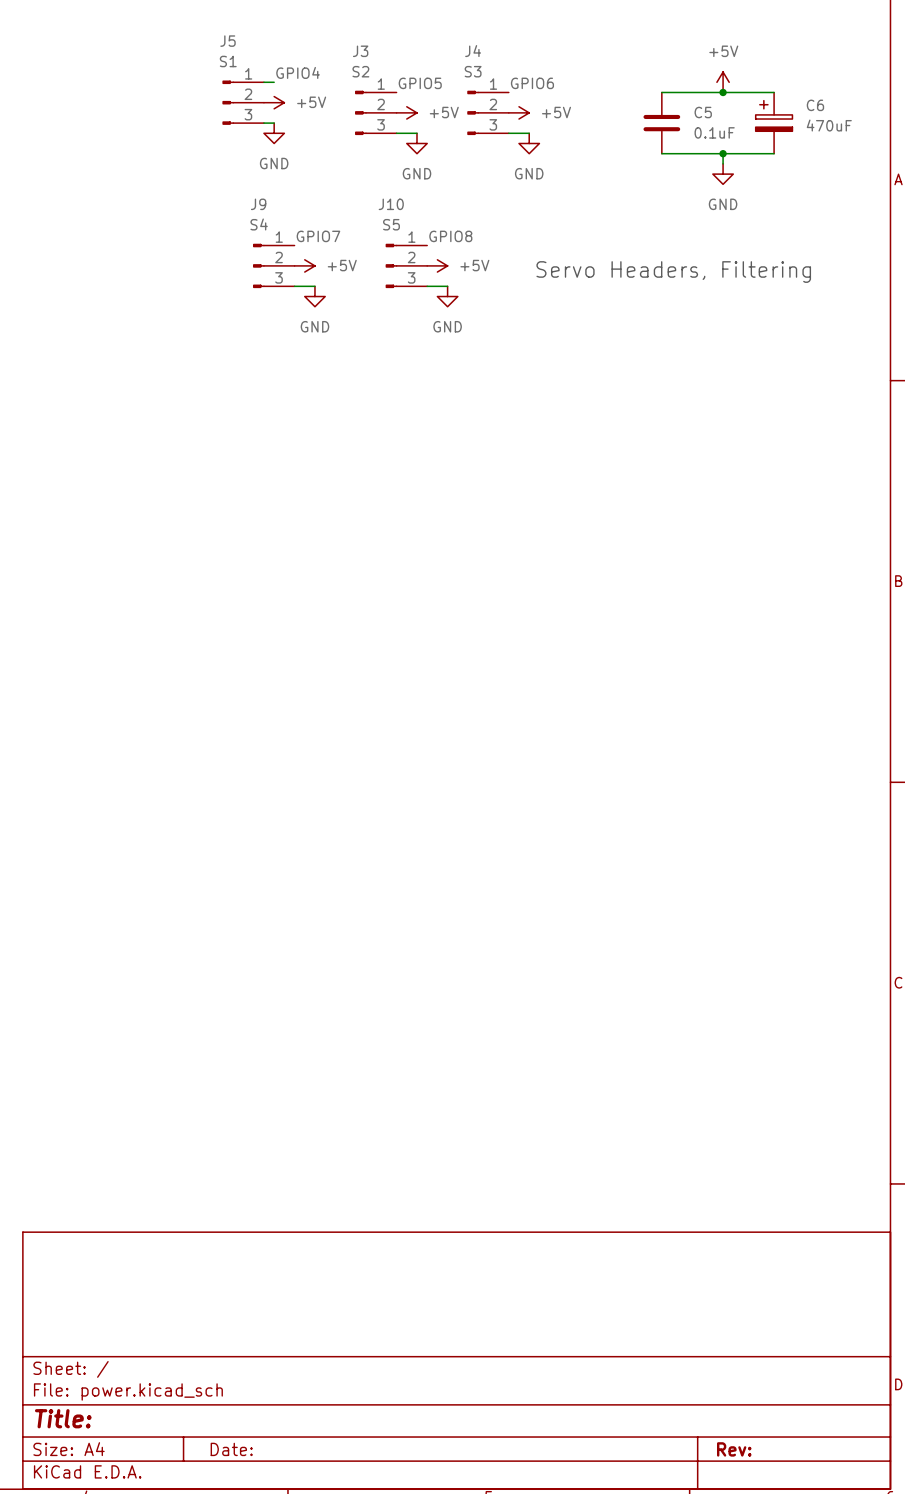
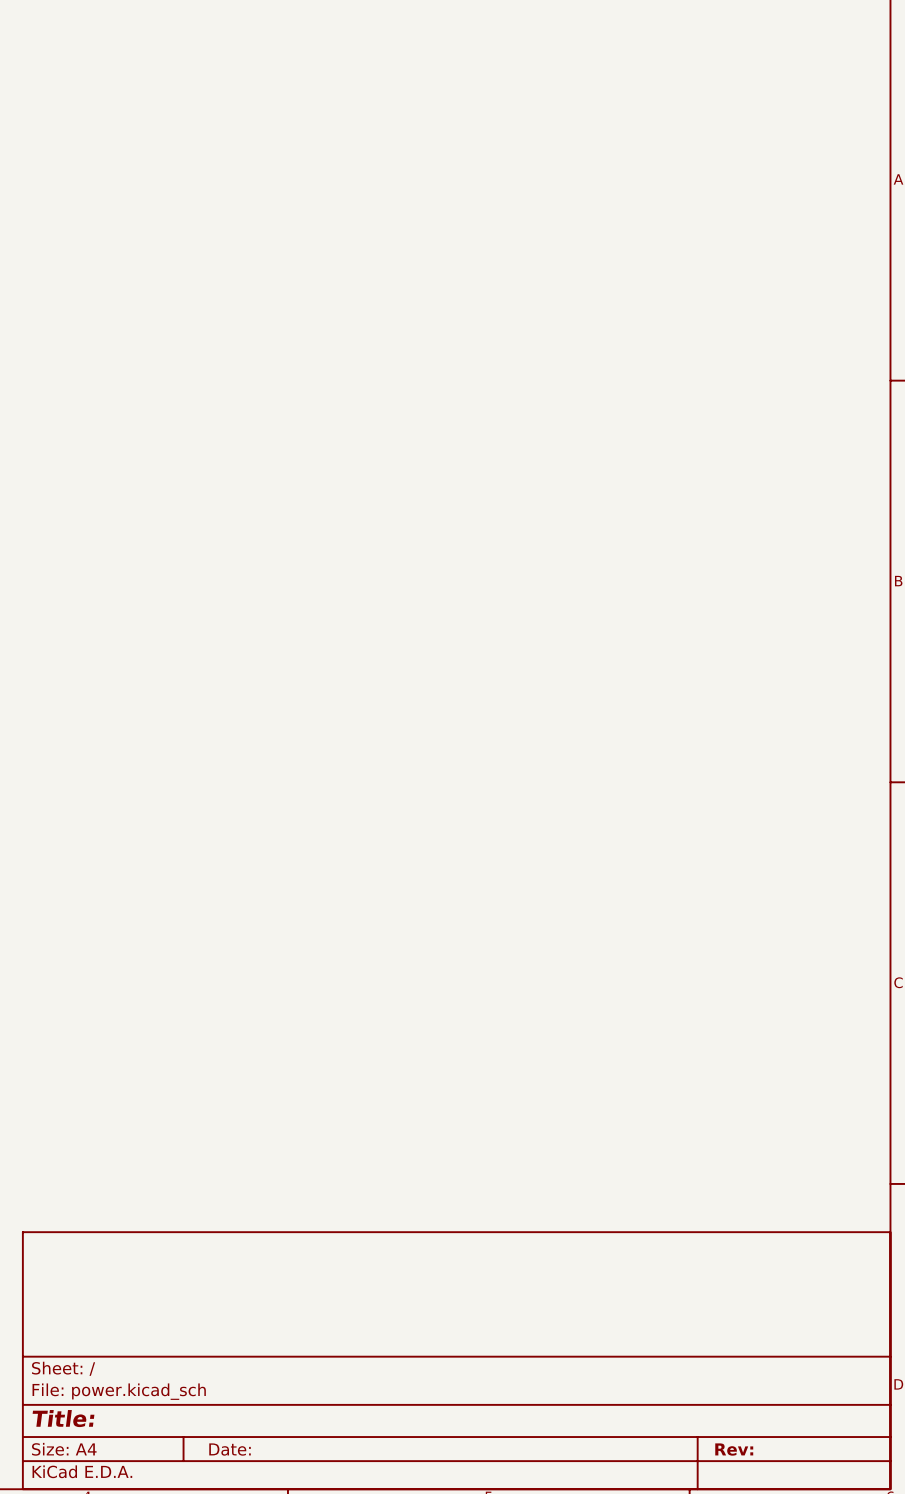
label: GPIO4 (298, 72) -> none
wire: (263, 82) (274, 82) -> none
power symbol: +5V (723, 82) -> none
label: GPIO5 (420, 83) -> none
label: GPIO6 (532, 83) -> none
wire: (661, 92) (774, 92) -> none
junction: (723, 92) -> none
J5: S1 (243, 102) -> none
power symbol: +5V (274, 102) -> none
J3: S2 (375, 112) -> none
power symbol: +5V (406, 112) -> none
J4: S3 (488, 112) -> none
power symbol: +5V (519, 112) -> none
wire: (263, 123) (274, 123) -> none
C5: 0.1uF (661, 123) -> none
C6: 470uF (774, 123) -> none
power symbol: GND (274, 133) -> none
wire: (396, 133) (416, 133) -> none
wire: (508, 133) (529, 133) -> none
power symbol: GND (416, 143) -> none
power symbol: GND (529, 143) -> none
wire: (661, 153) (774, 153) -> none
wire: (723, 153) (723, 163) -> none
junction: (723, 153) -> none
power symbol: GND (723, 174) -> none
label: GPIO7 (318, 236) -> none
label: GPIO8 (450, 236) -> none
J9: S4 (273, 265) -> none
power symbol: +5V (304, 265) -> none
J10: S5 (406, 265) -> none
power symbol: +5V (437, 265) -> none
text: Servo Headers, Filtering (673, 272) -> none
wire: (294, 286) (314, 286) -> none
wire: (427, 286) (447, 286) -> none
power symbol: GND (314, 296) -> none
power symbol: GND (447, 296) -> none

